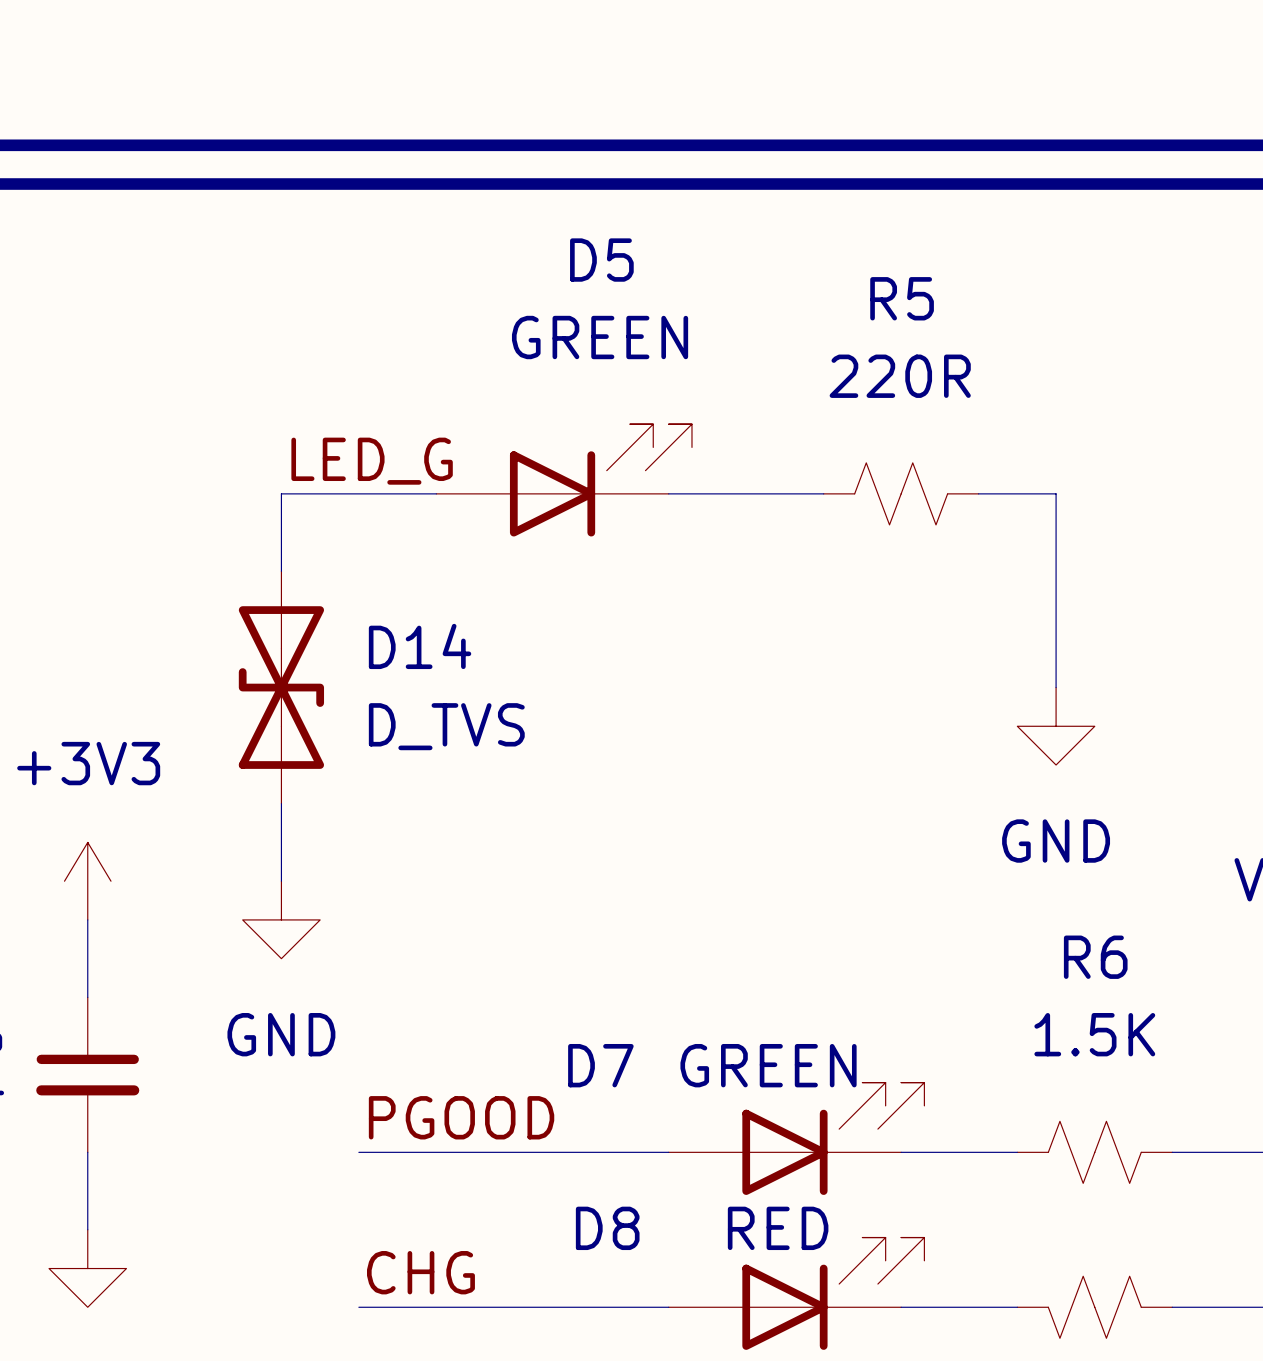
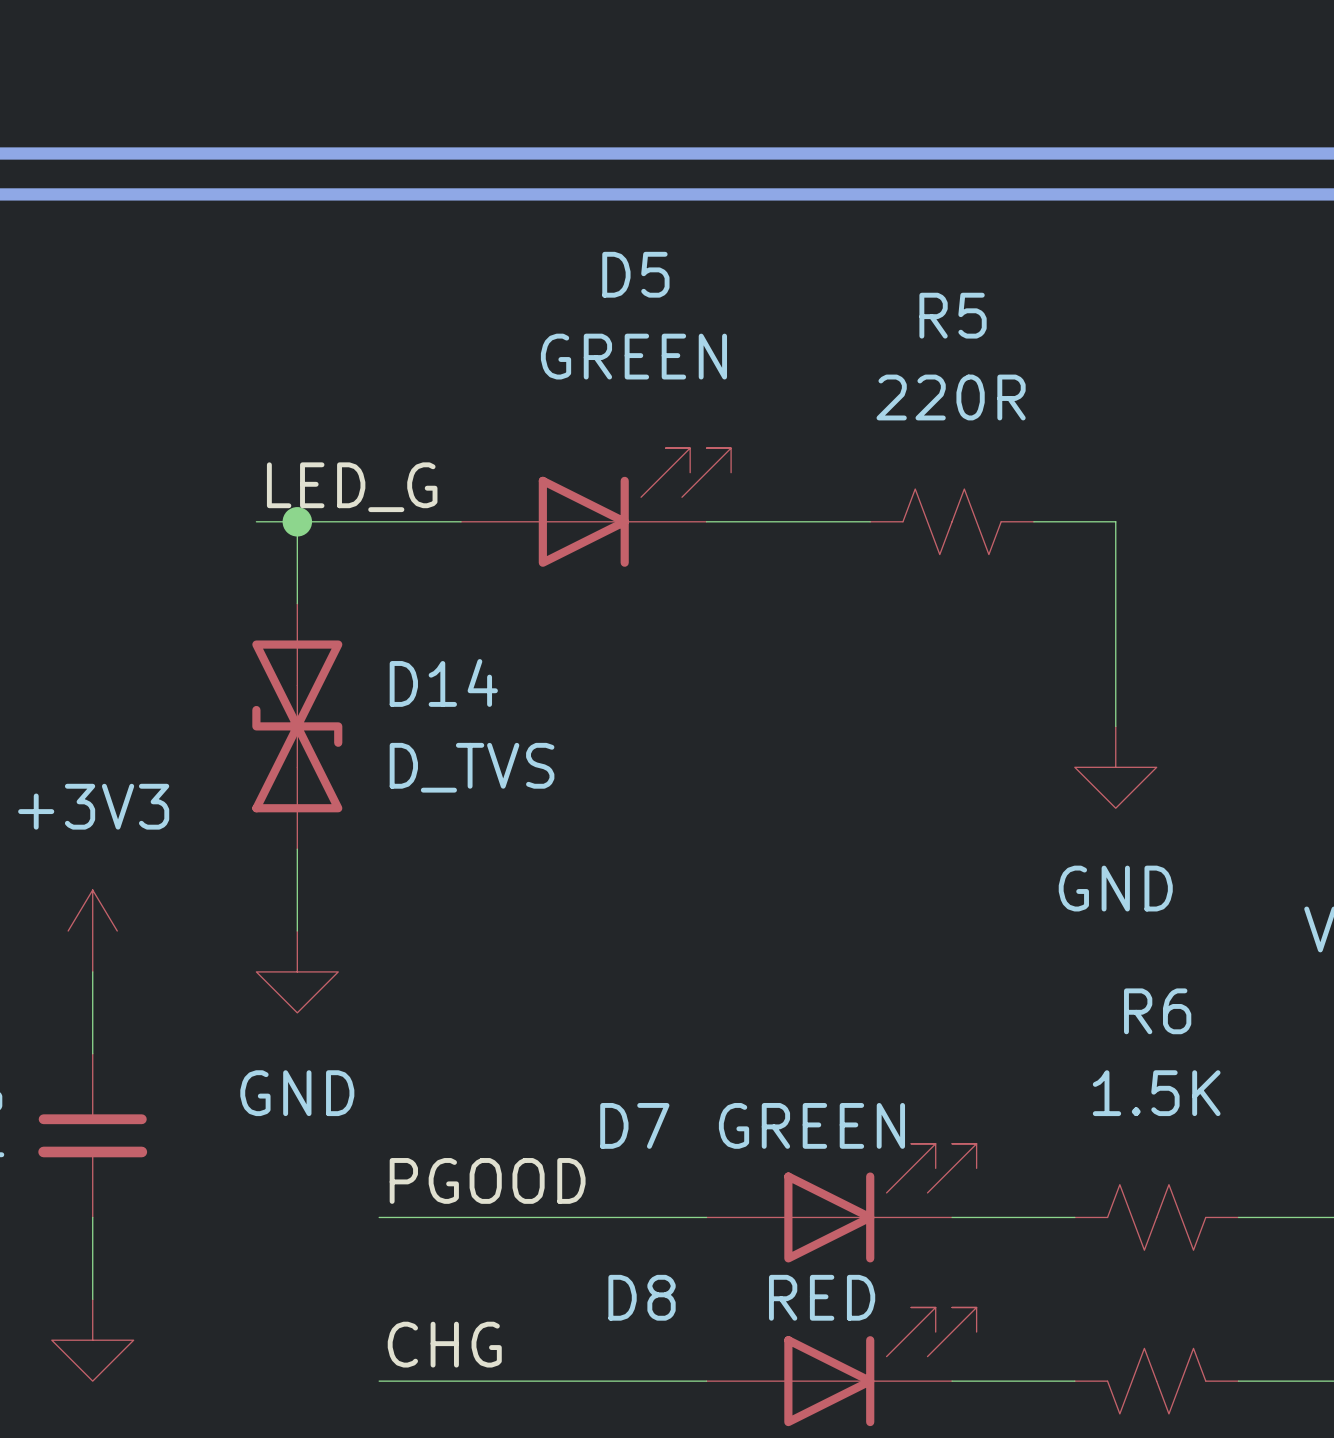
label position: LED_G (372, 461) -> LED_G (352, 487)
wire: none -> (256, 521) (297, 521)
junction: none -> (297, 521)

